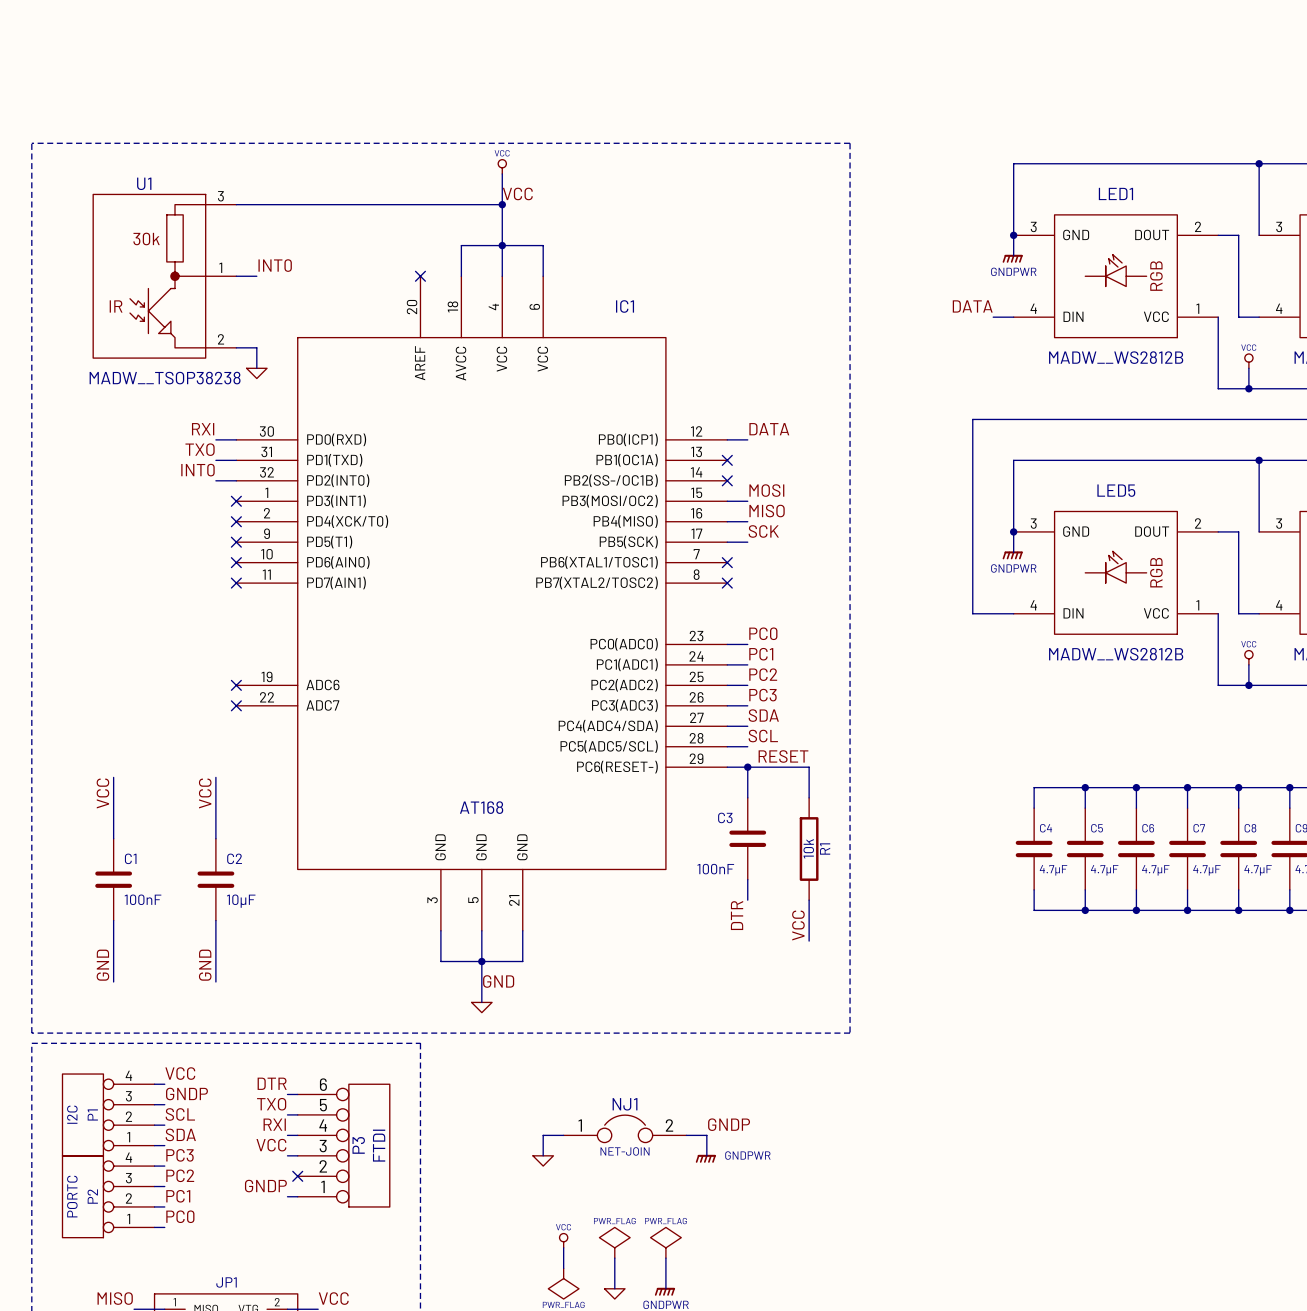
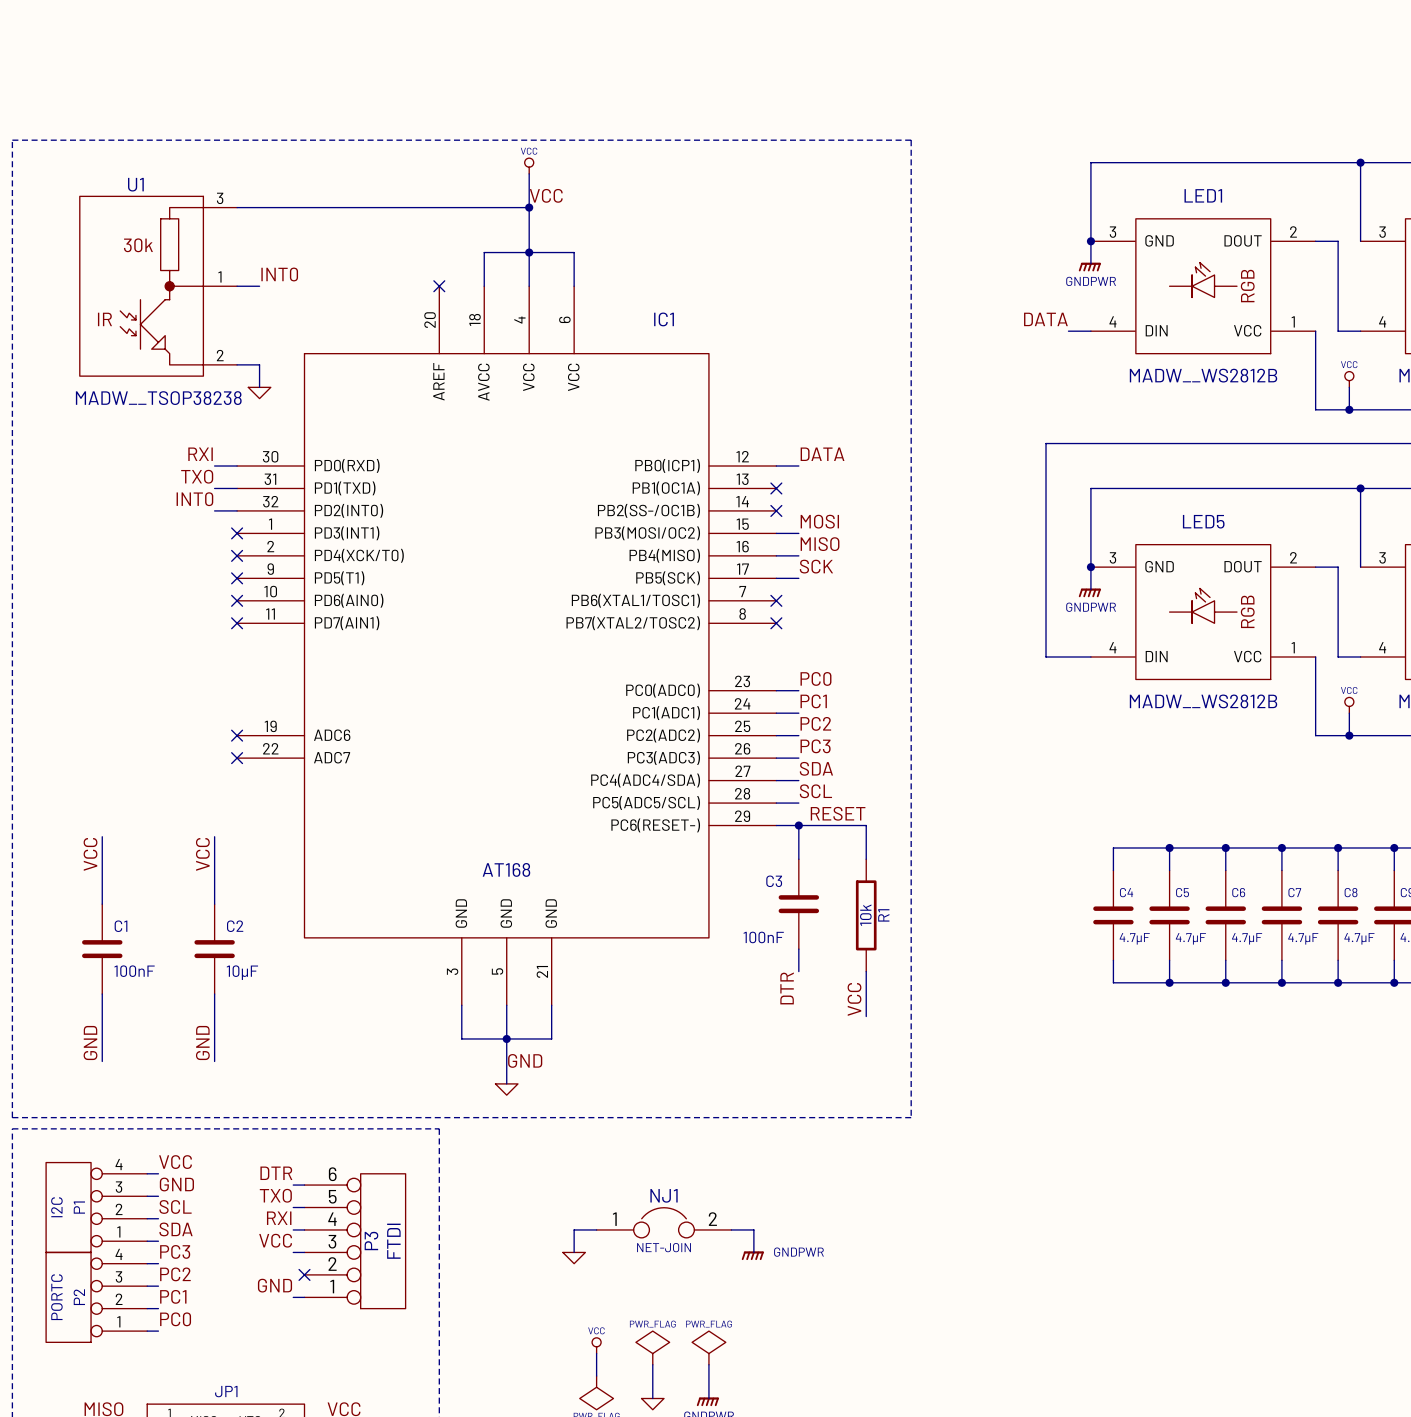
label: GNDP (186, 1093) -> GND (176, 1184)
label: GNDP (729, 1124) -> none
label: GNDP (265, 1186) -> GND (274, 1285)

